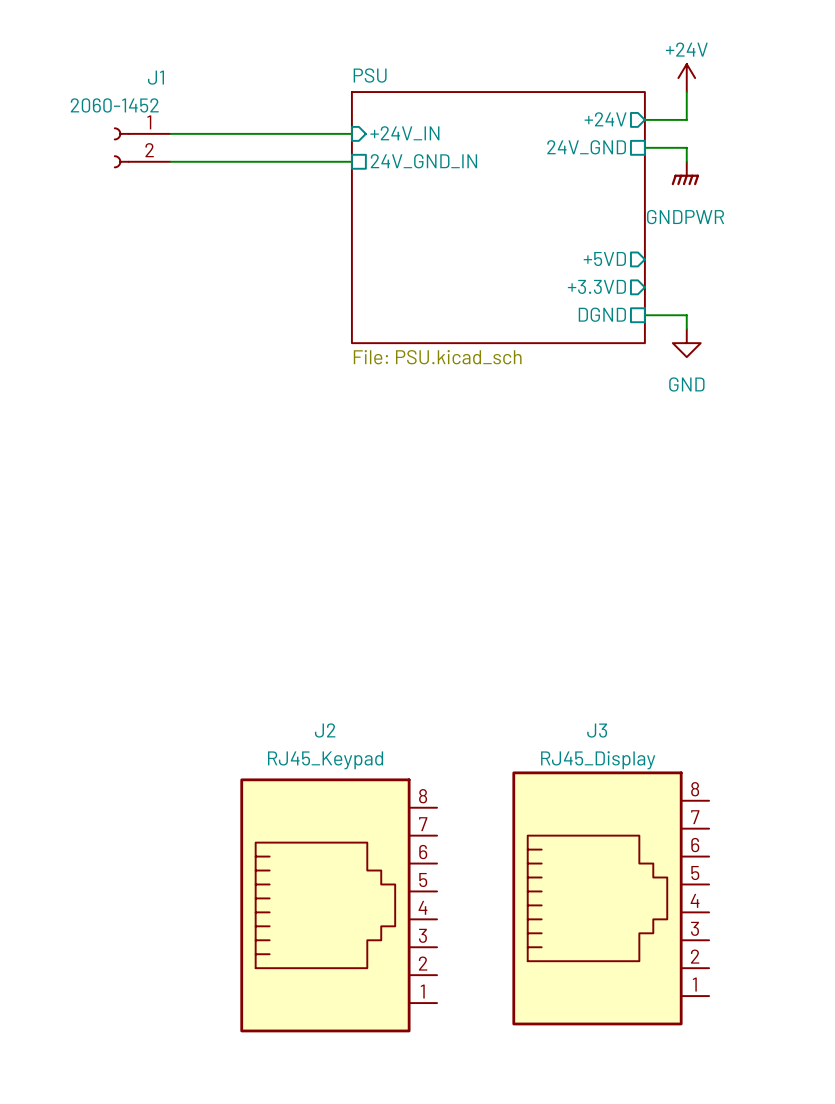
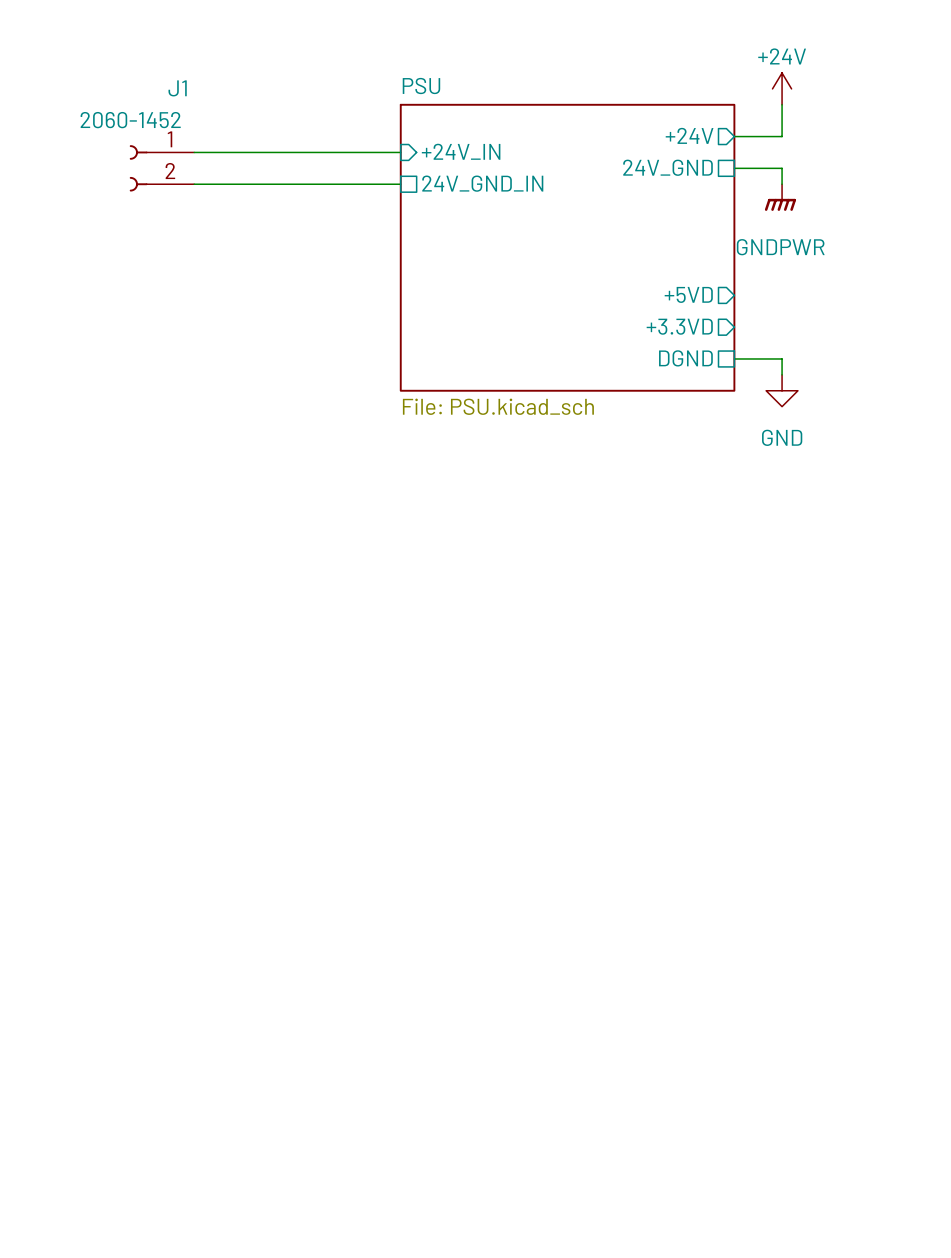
J3: RJ45_Display (610, 898) -> none
J2: RJ45_Keypad (338, 905) -> none

